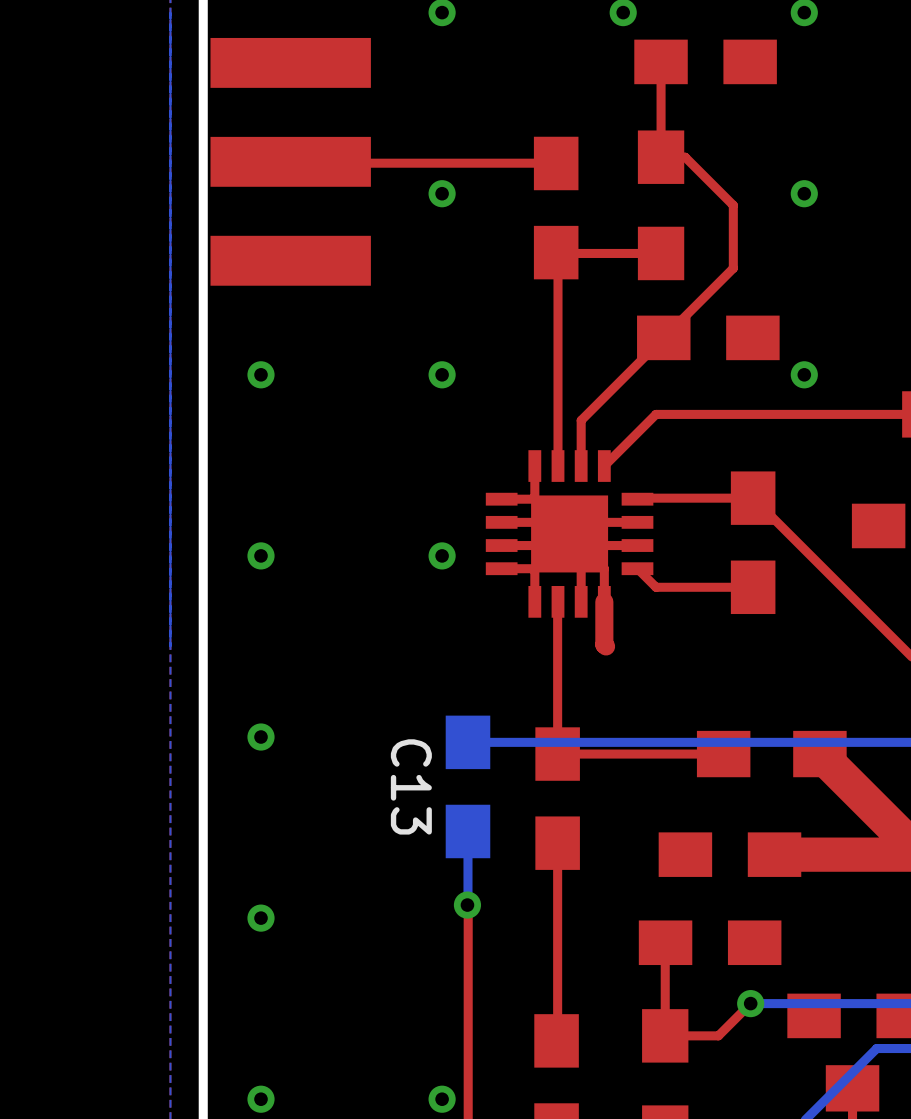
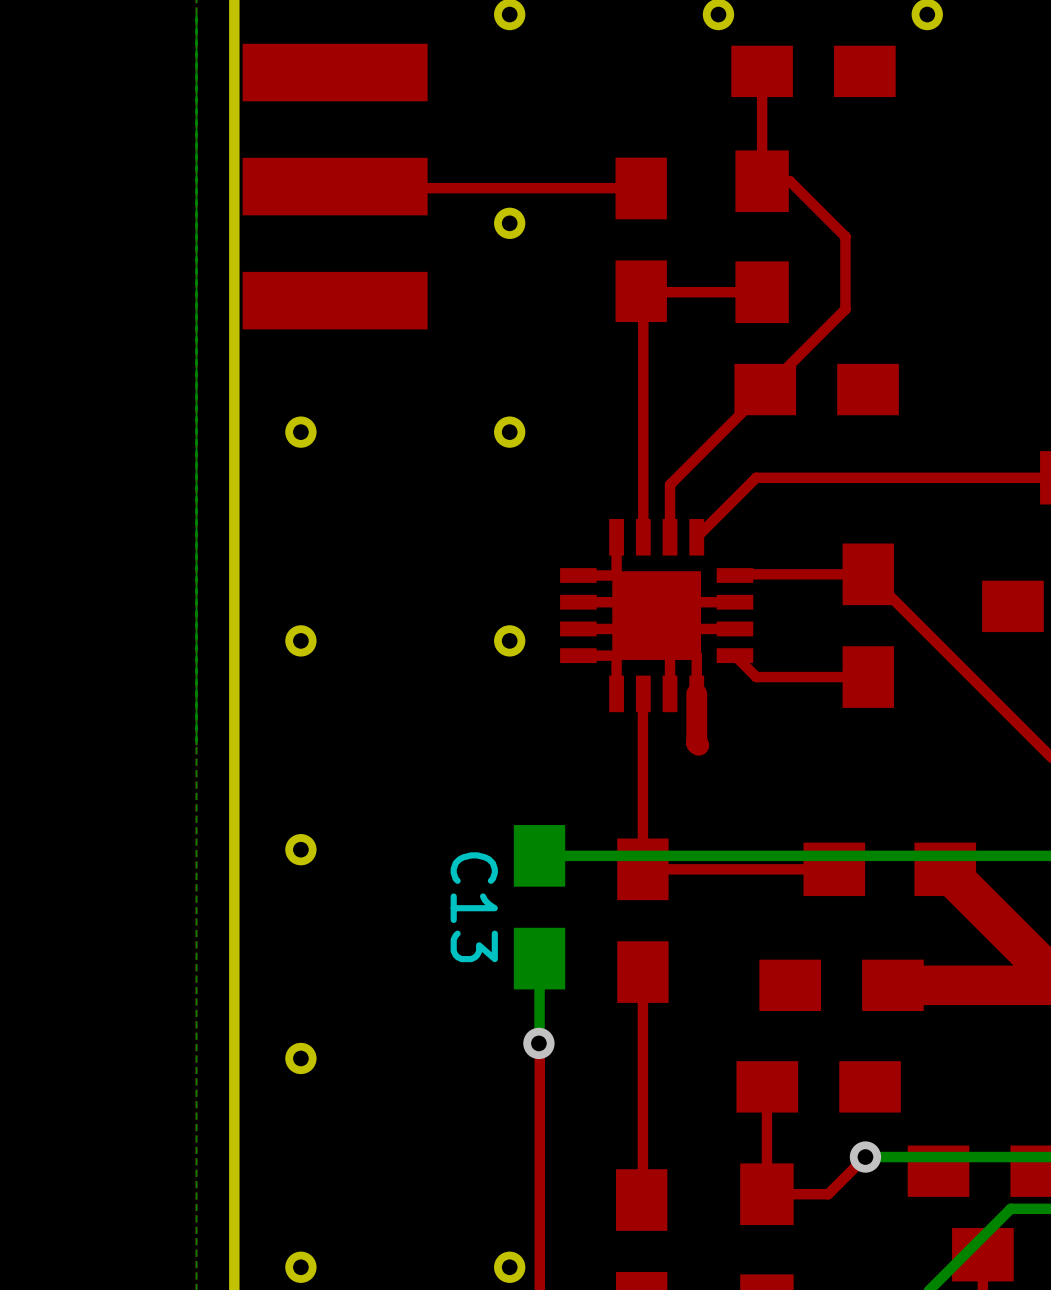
part: (804, 193) -> none
part: (804, 374) -> none

